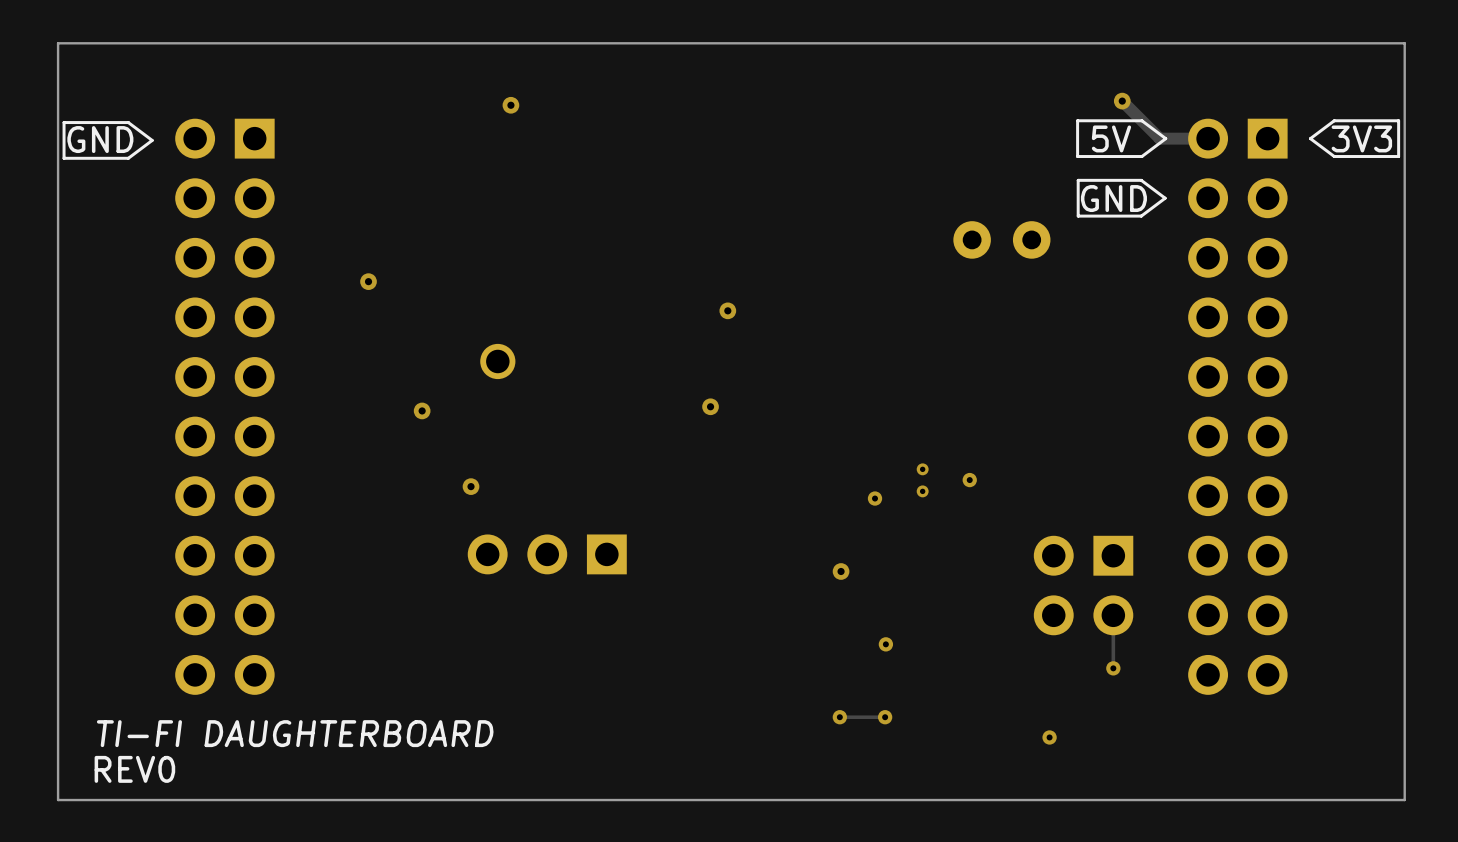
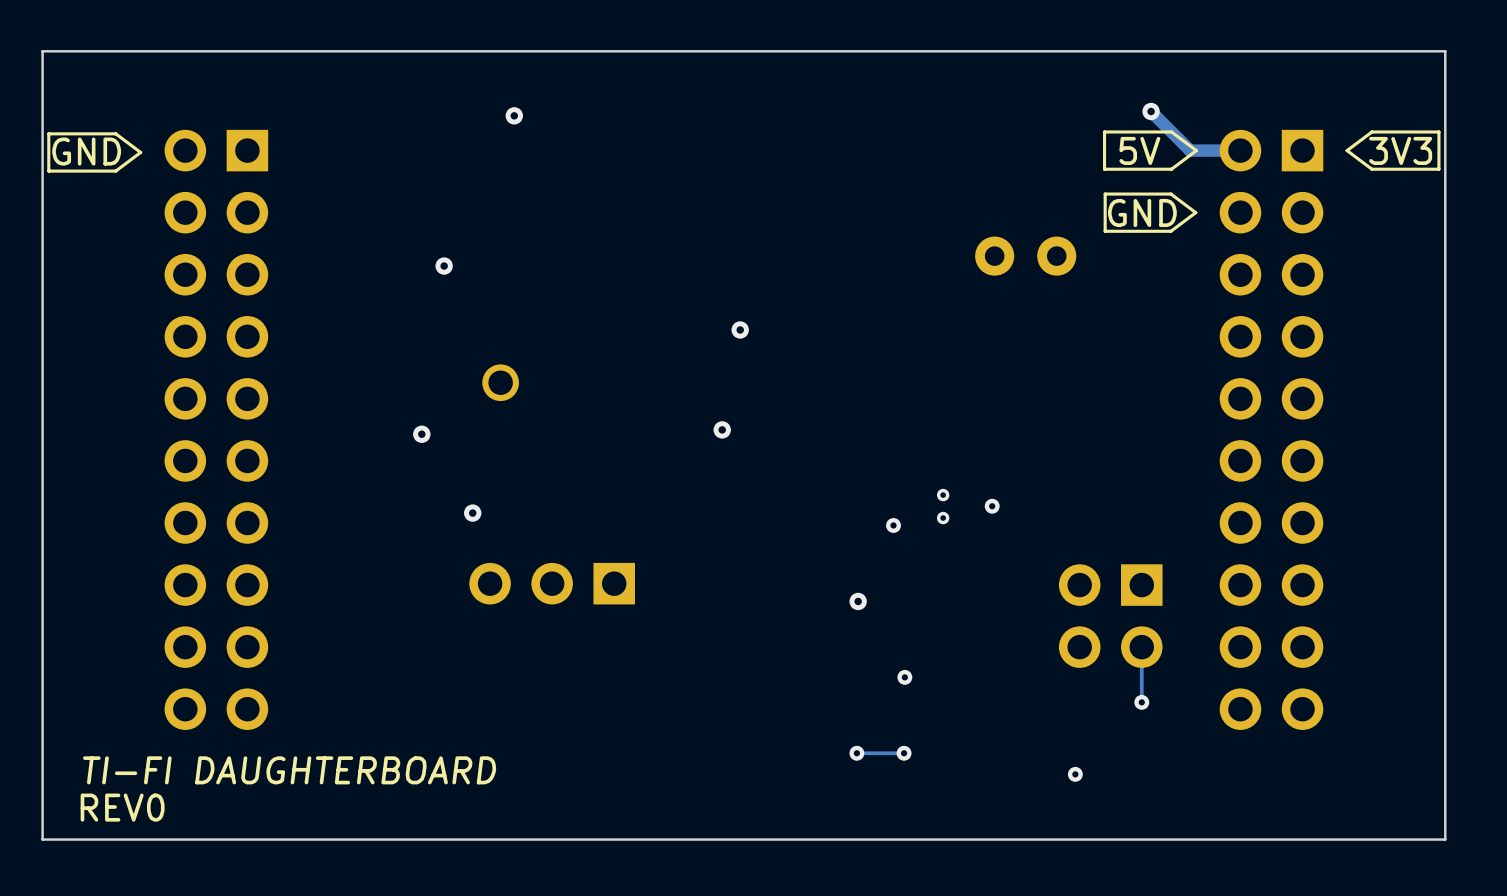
via position: (368, 281) -> (444, 266)

